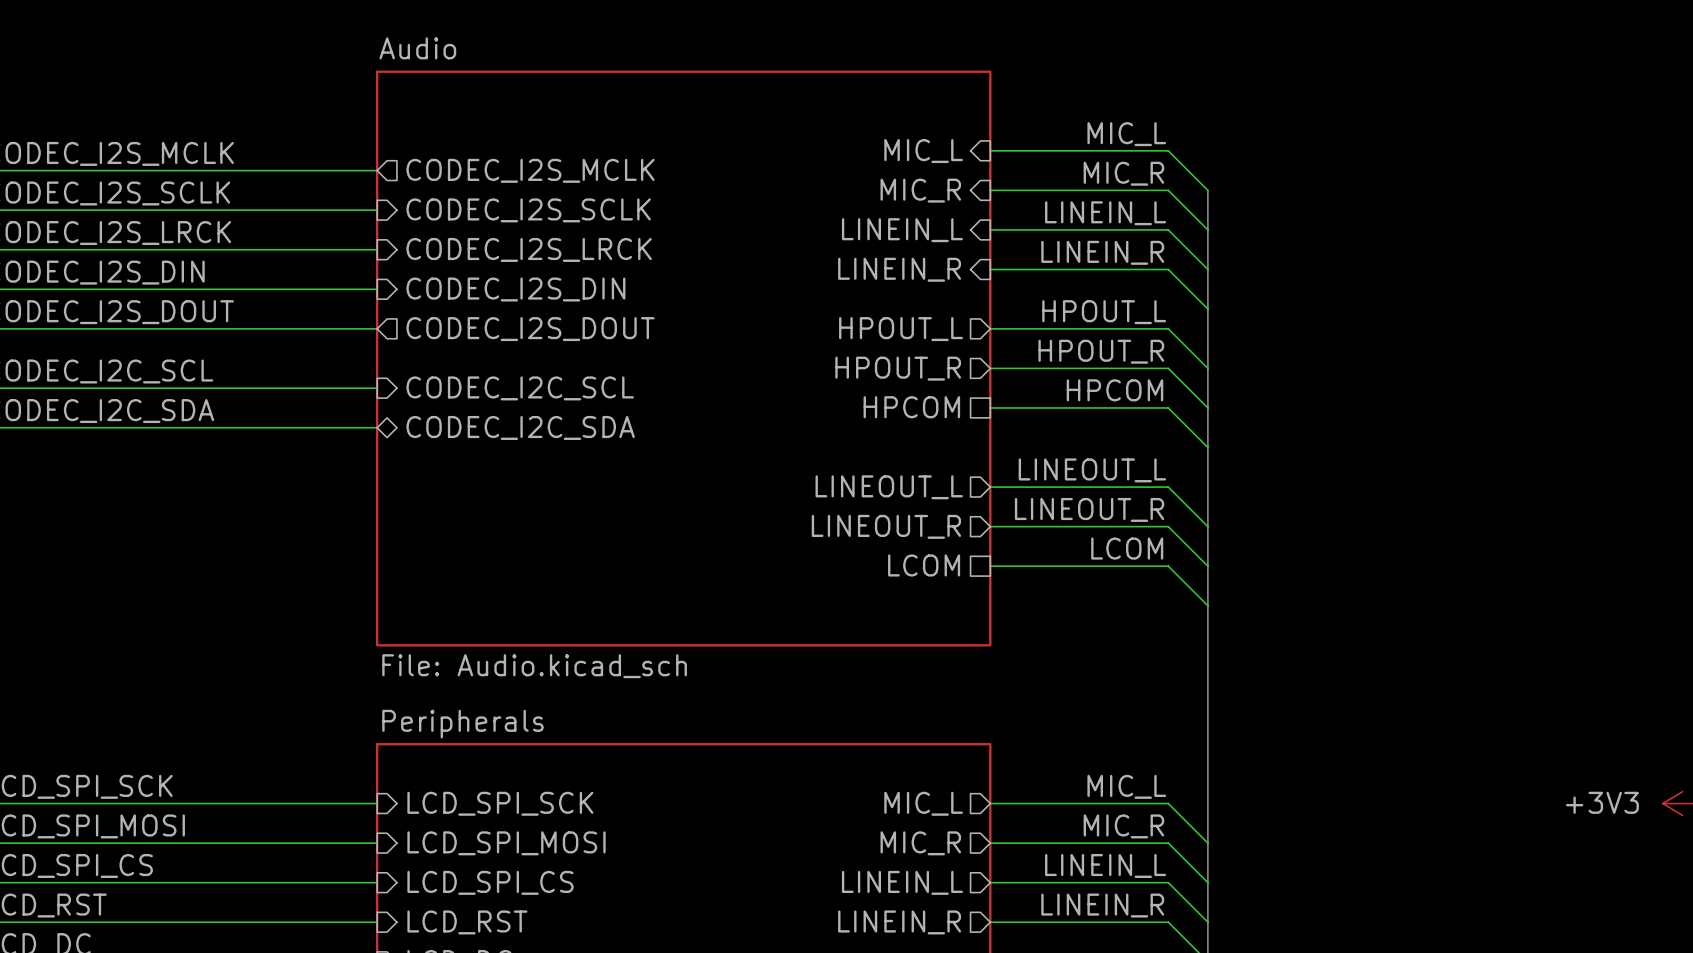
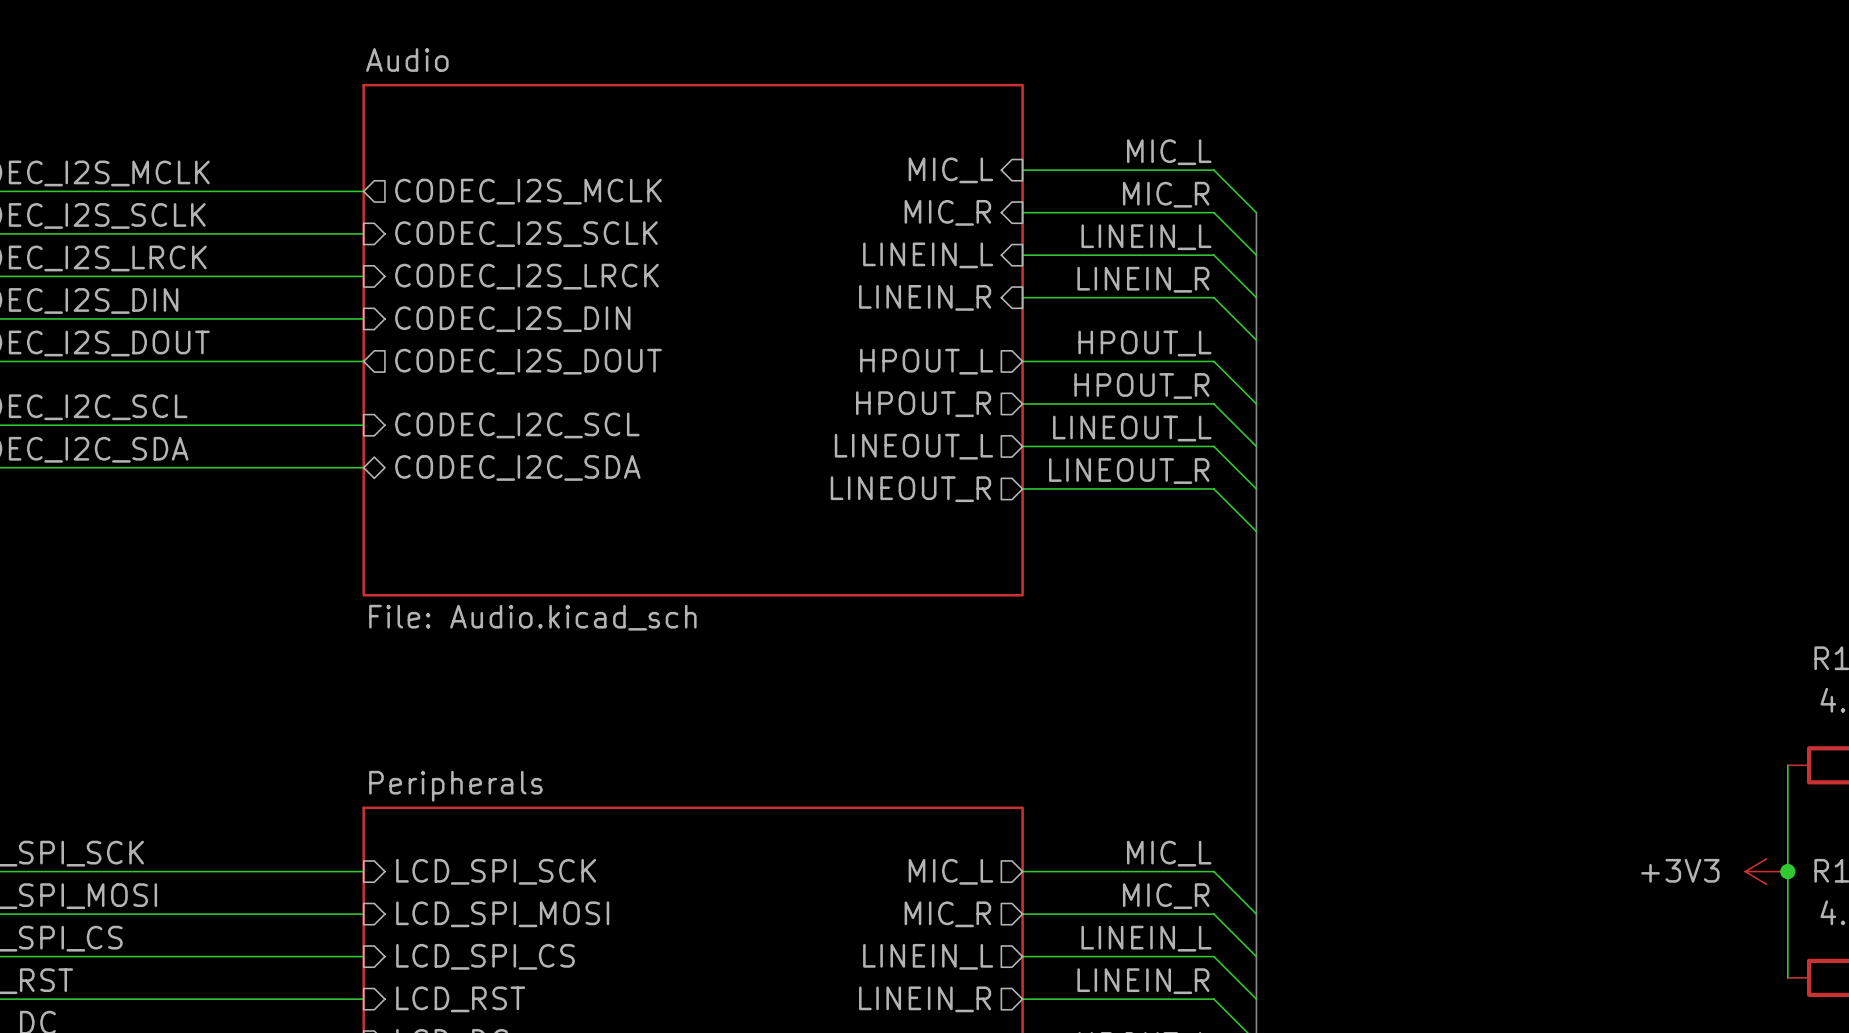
sheet Audio: none -> File: Audio.kicad_sch (693, 340)
sheet Audio: File: Audio.kicad_sch (683, 358) -> none
label: HPCOM (1114, 390) -> LINEOUT_L (1132, 428)
sheet pin shape: passive (911, 407) -> output (913, 446)
sheet pin: HPCOM (911, 407) -> LINEOUT_L (913, 446)
label: LINEOUT_L (1092, 470) -> none
sheet pin: LINEOUT_L (889, 487) -> none
wire: (990, 487) (1168, 487) (1207, 526) -> (1022, 488) (1213, 488) (1256, 531)
label position: LINEOUT_R (1089, 509) -> LINEOUT_R (1129, 471)
sheet pin position: LINEOUT_R (886, 526) -> LINEOUT_R (910, 489)
wire: (990, 526) (1168, 526) (1207, 566) -> none
label: LCOM (1127, 548) -> none
sheet pin: LCOM (924, 565) -> none
wire: (990, 566) (1168, 566) (1207, 605) -> none

